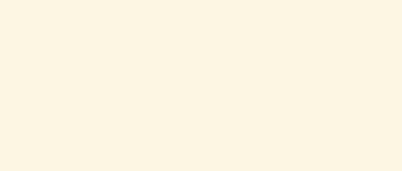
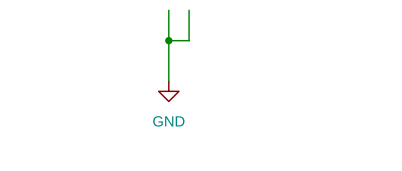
wire: none -> (168, 10) (168, 81)
wire: none -> (189, 10) (189, 40) (168, 40)
junction: none -> (168, 40)
power symbol: none -> GND (168, 91)

